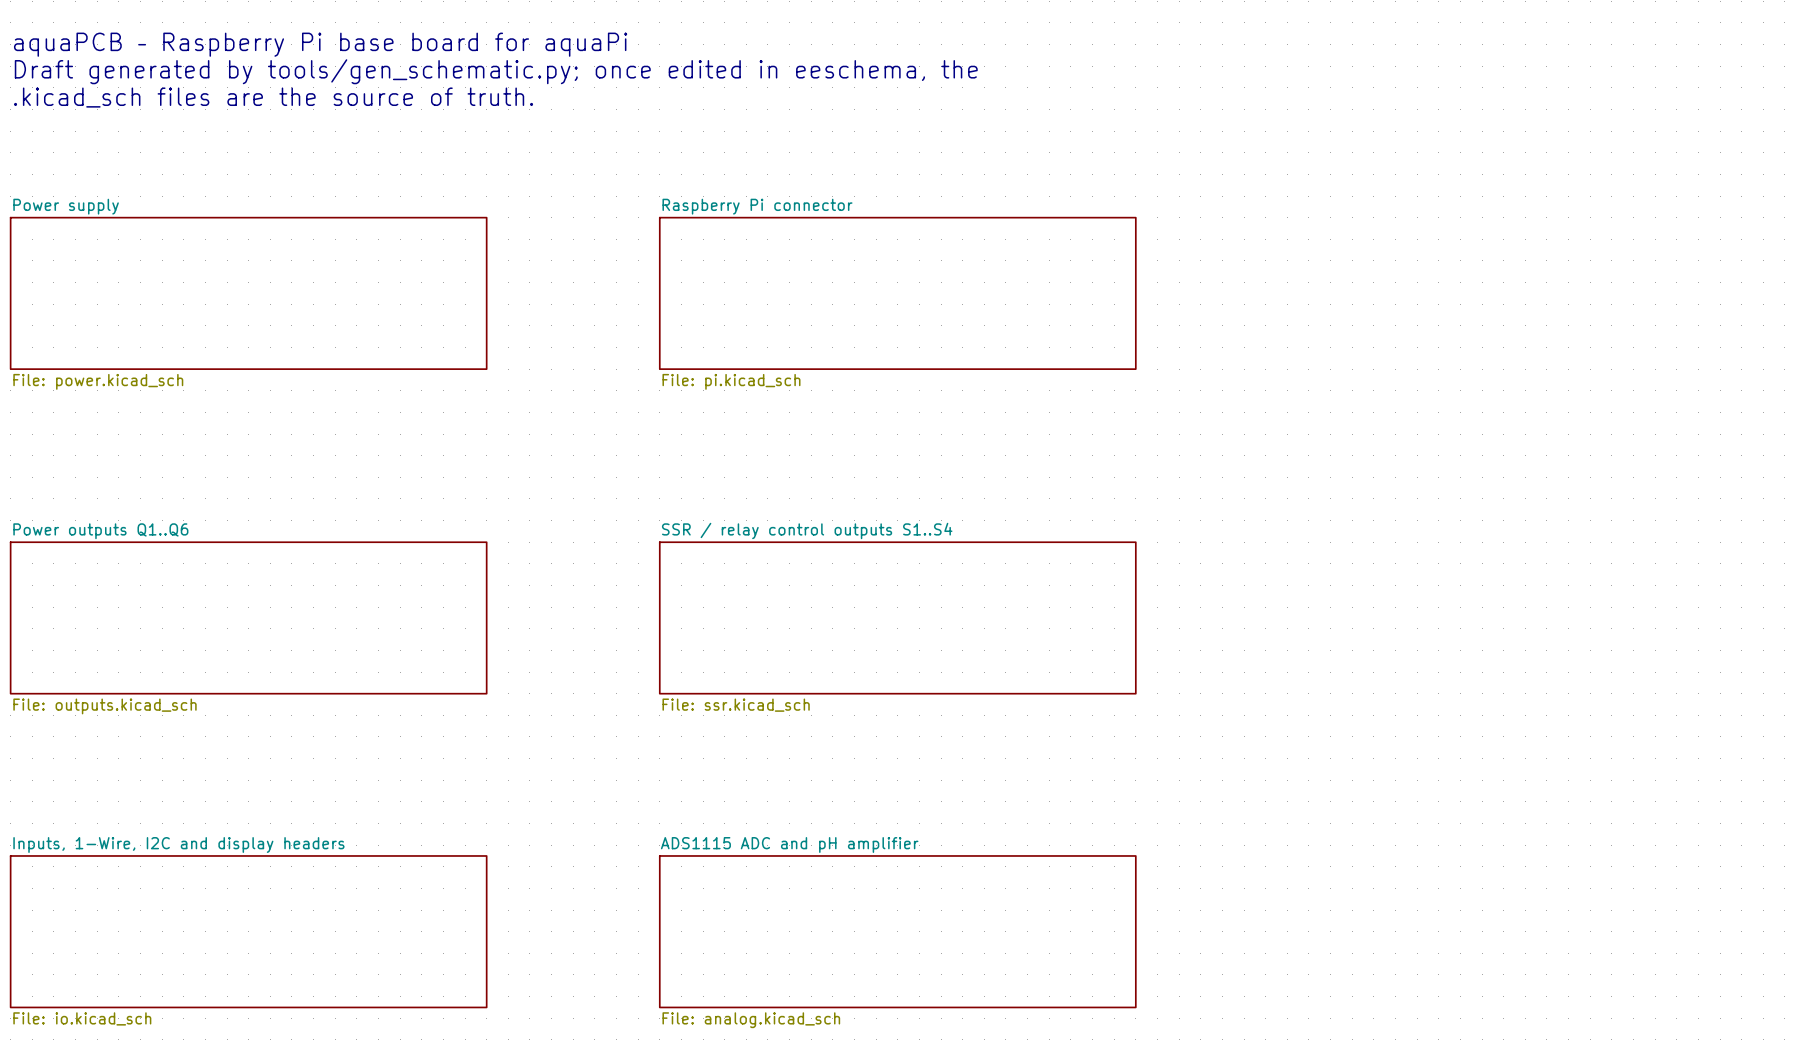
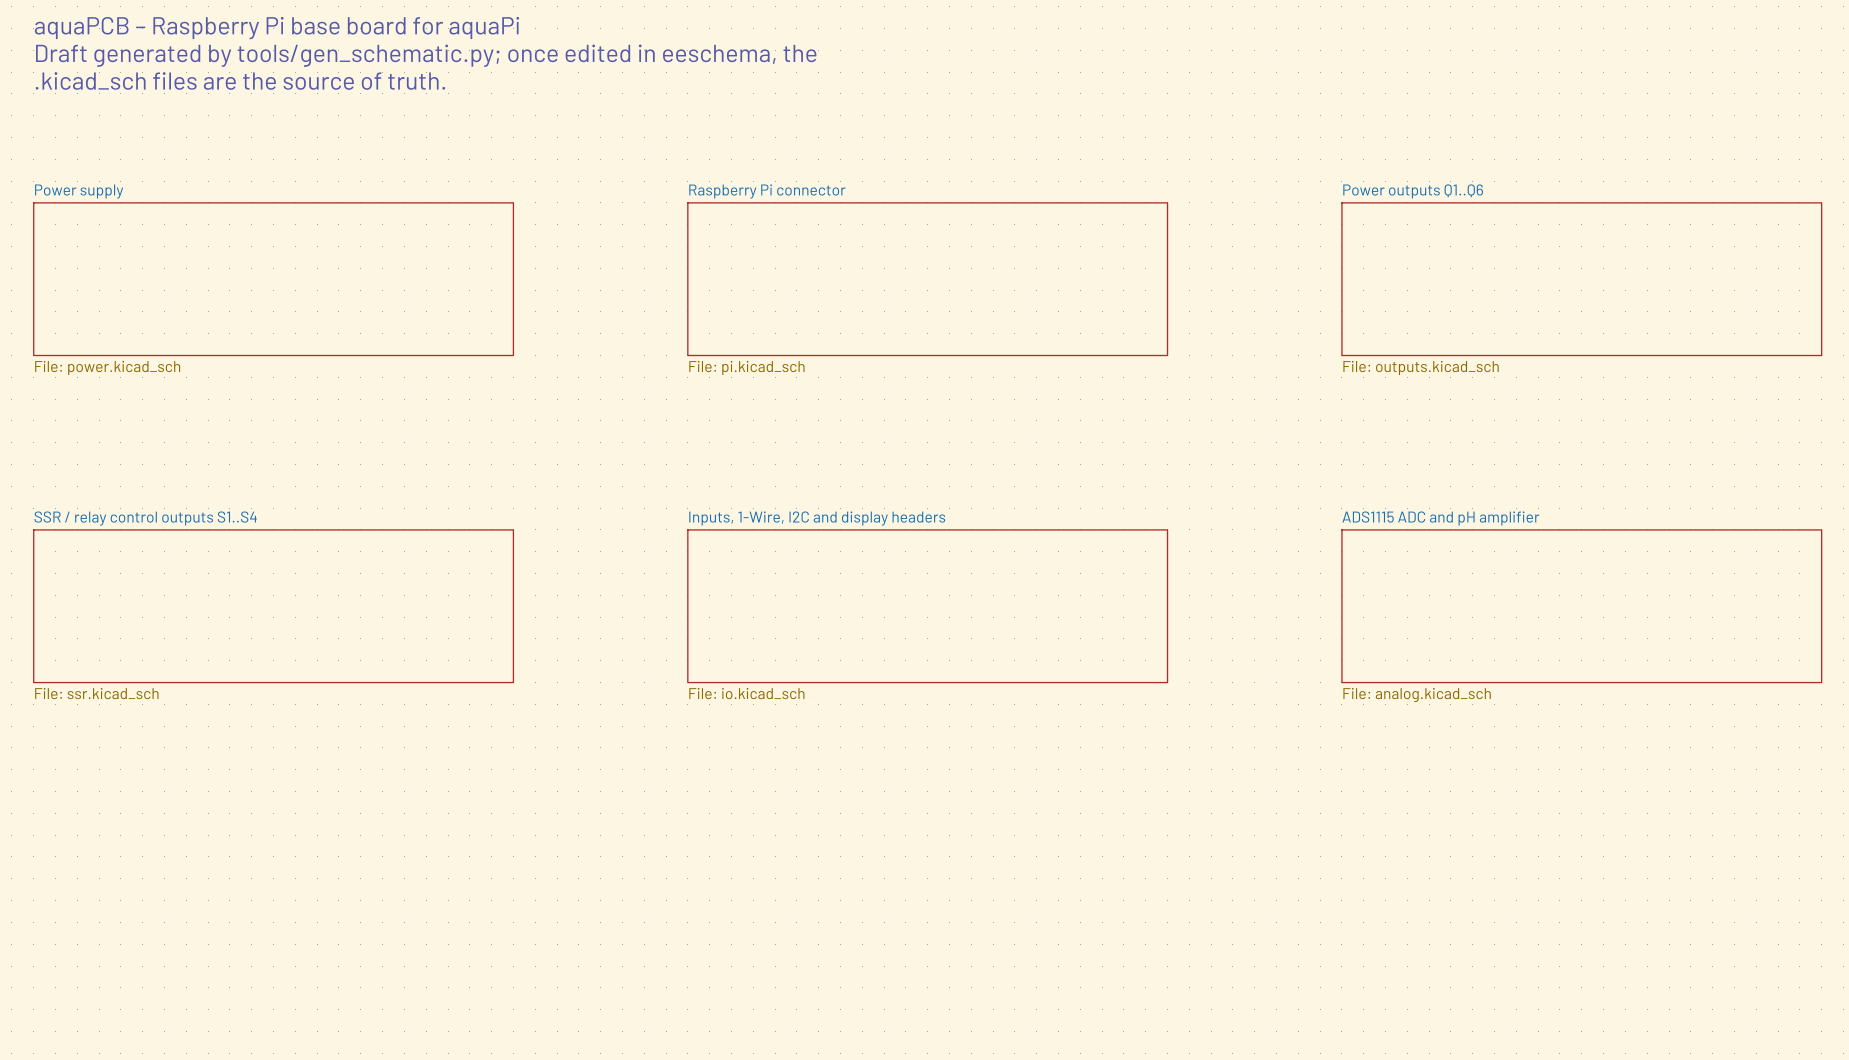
sheet Power outputs Q1..Q6: none -> File: outputs.kicad_sch (1581, 279)
sheet SSR / relay control outputs S1..S4 name: SSR / relay control outputs S1..S4 (807, 530) -> Inputs, 1-Wire, I2C and display headers (817, 518)
sheet Power outputs Q1..Q6 name: Power outputs Q1..Q6 (100, 531) -> SSR / relay control outputs S1..S4 (145, 518)
sheet SSR / relay control outputs S1..S4 value: File: ssr.kicad_sch (736, 705) -> File: io.kicad_sch (746, 693)
sheet Power outputs Q1..Q6 value: File: outputs.kicad_sch (104, 706) -> File: ssr.kicad_sch (96, 693)
sheet Inputs, 1-Wire, I2C and display headers: File: io.kicad_sch (248, 931) -> none
sheet ADS1115 ADC and pH amplifier position: (897, 931) -> (1581, 606)

